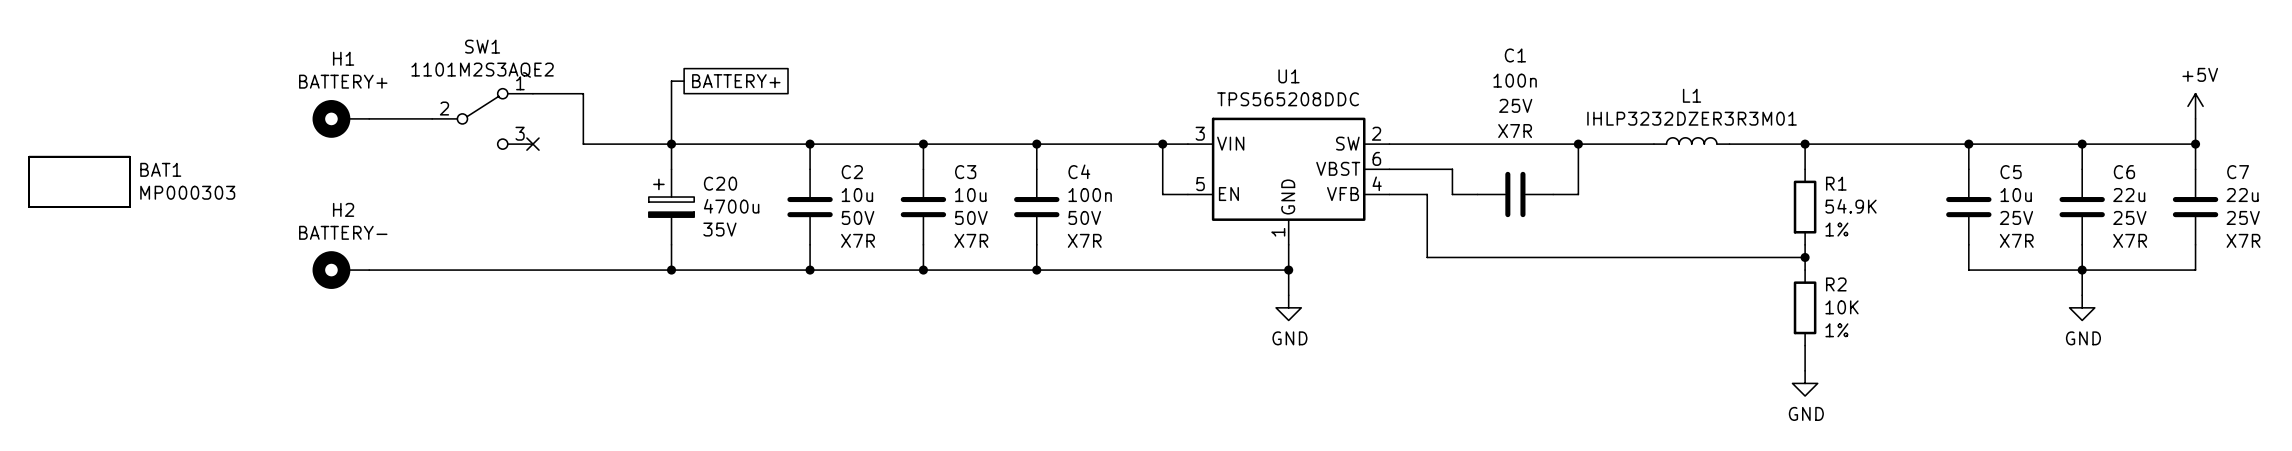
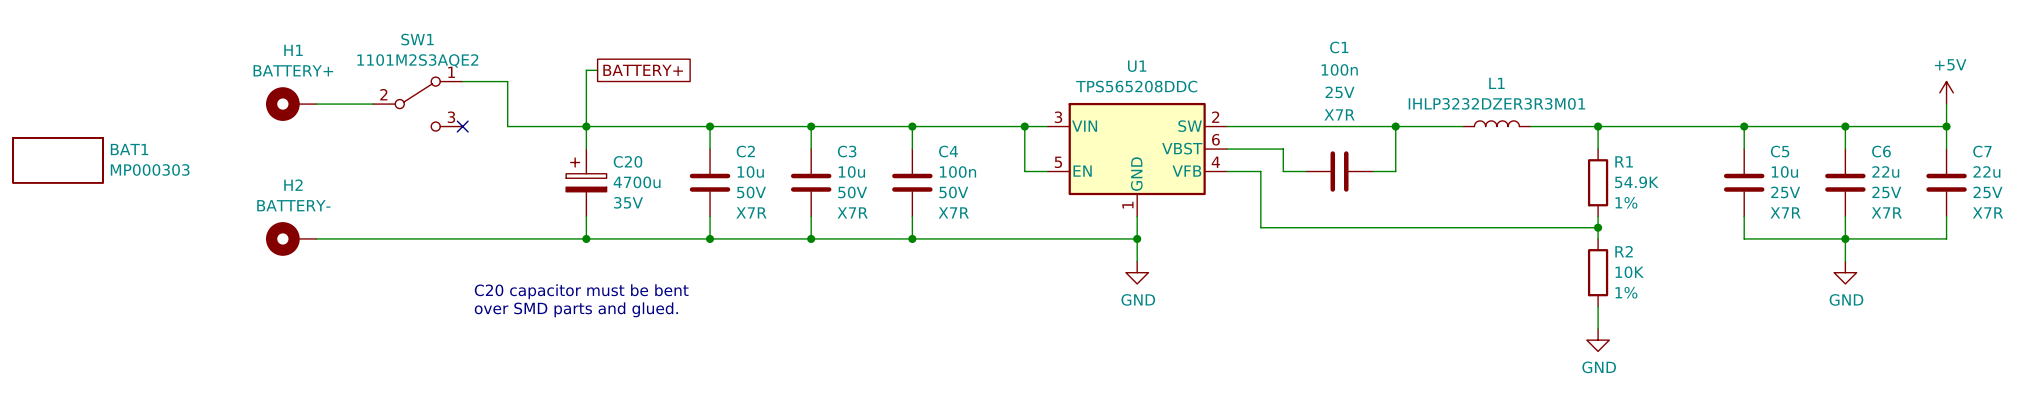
text: none -> C20 capacitor must be bent (581, 291)
text: none -> over SMD parts and glued. (576, 309)

